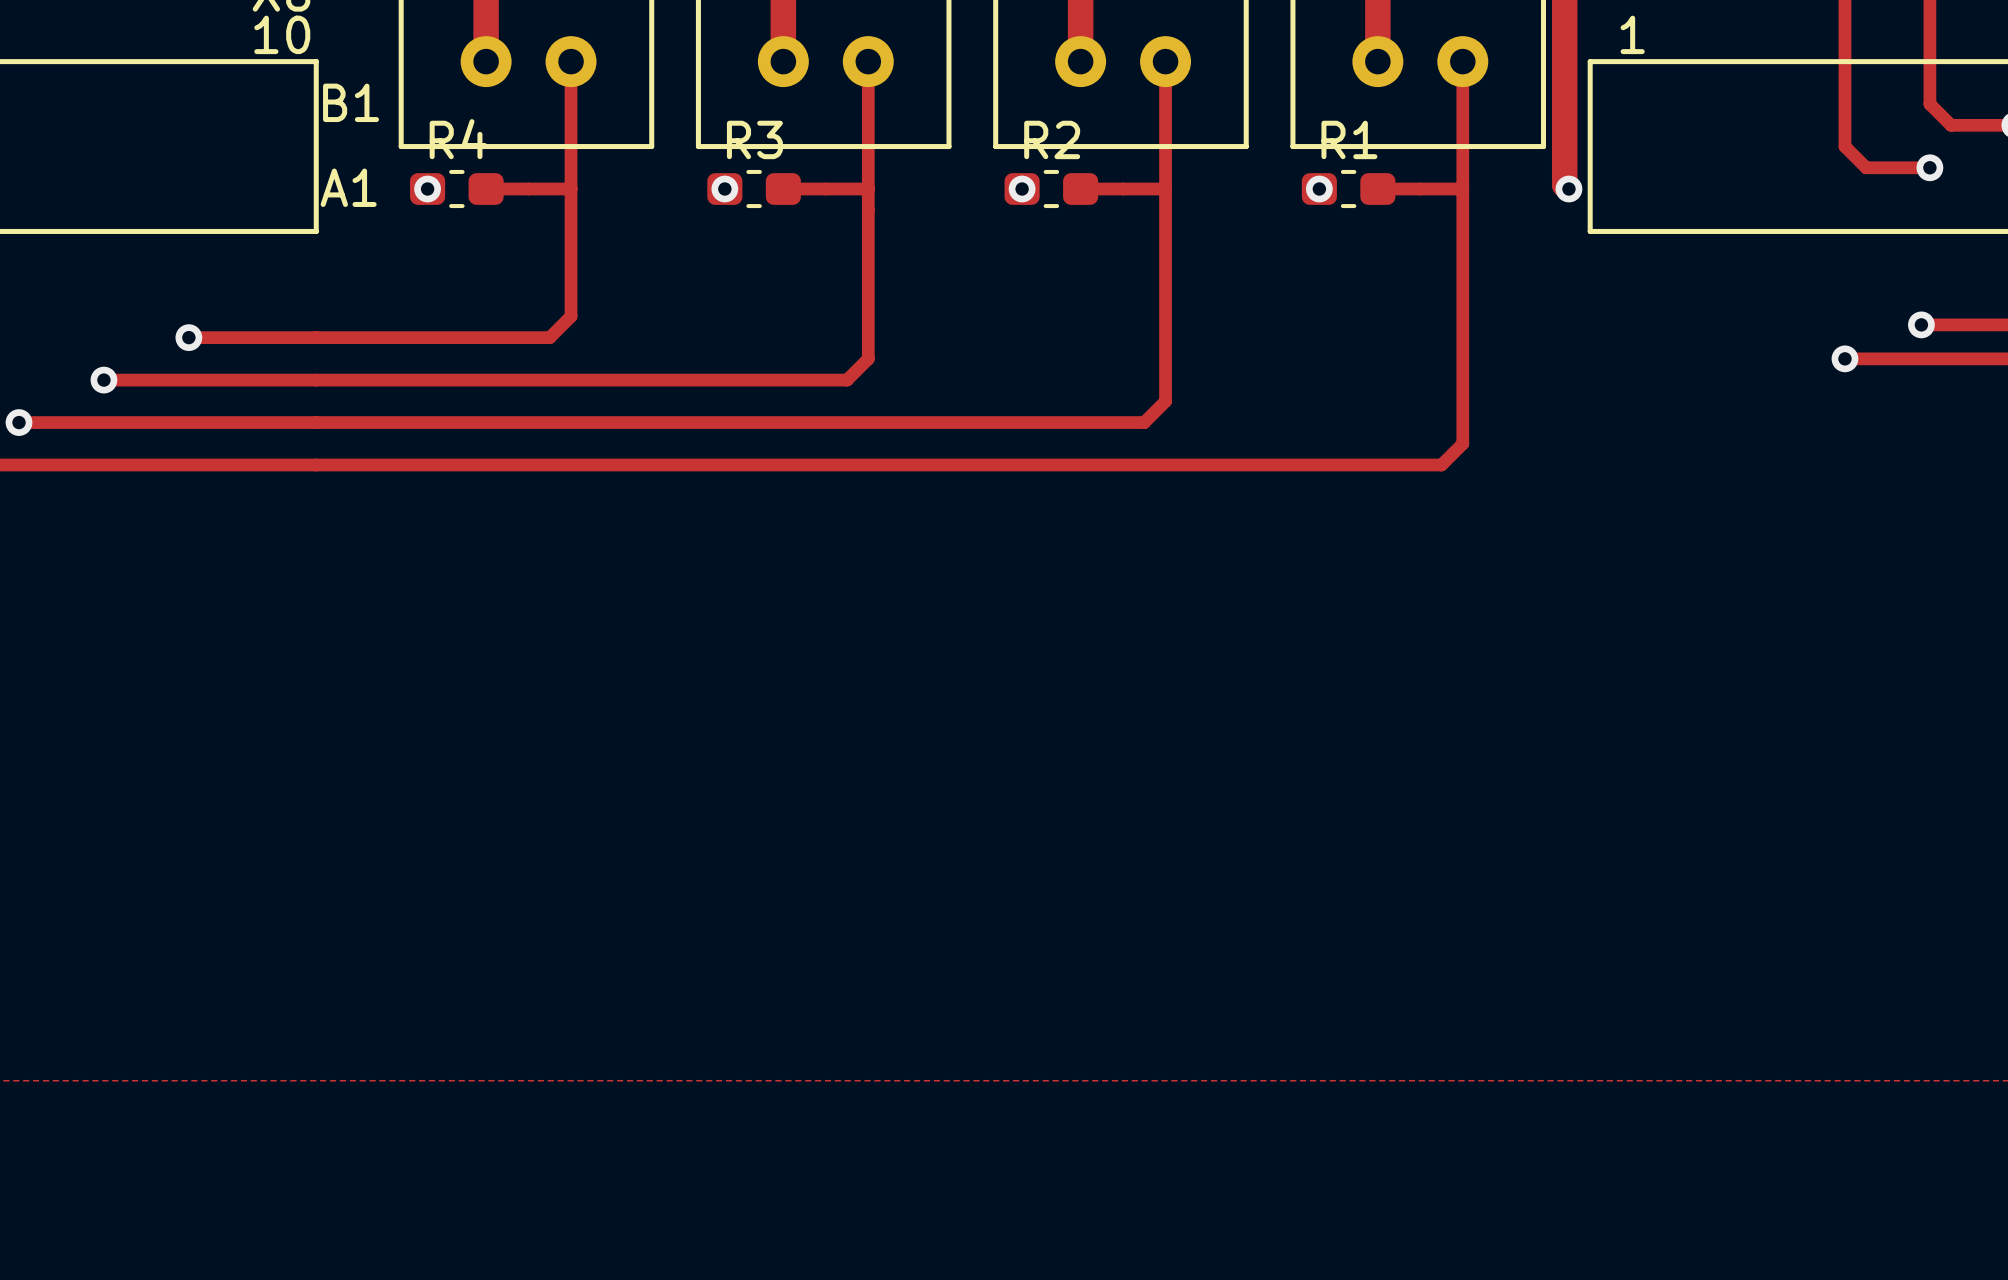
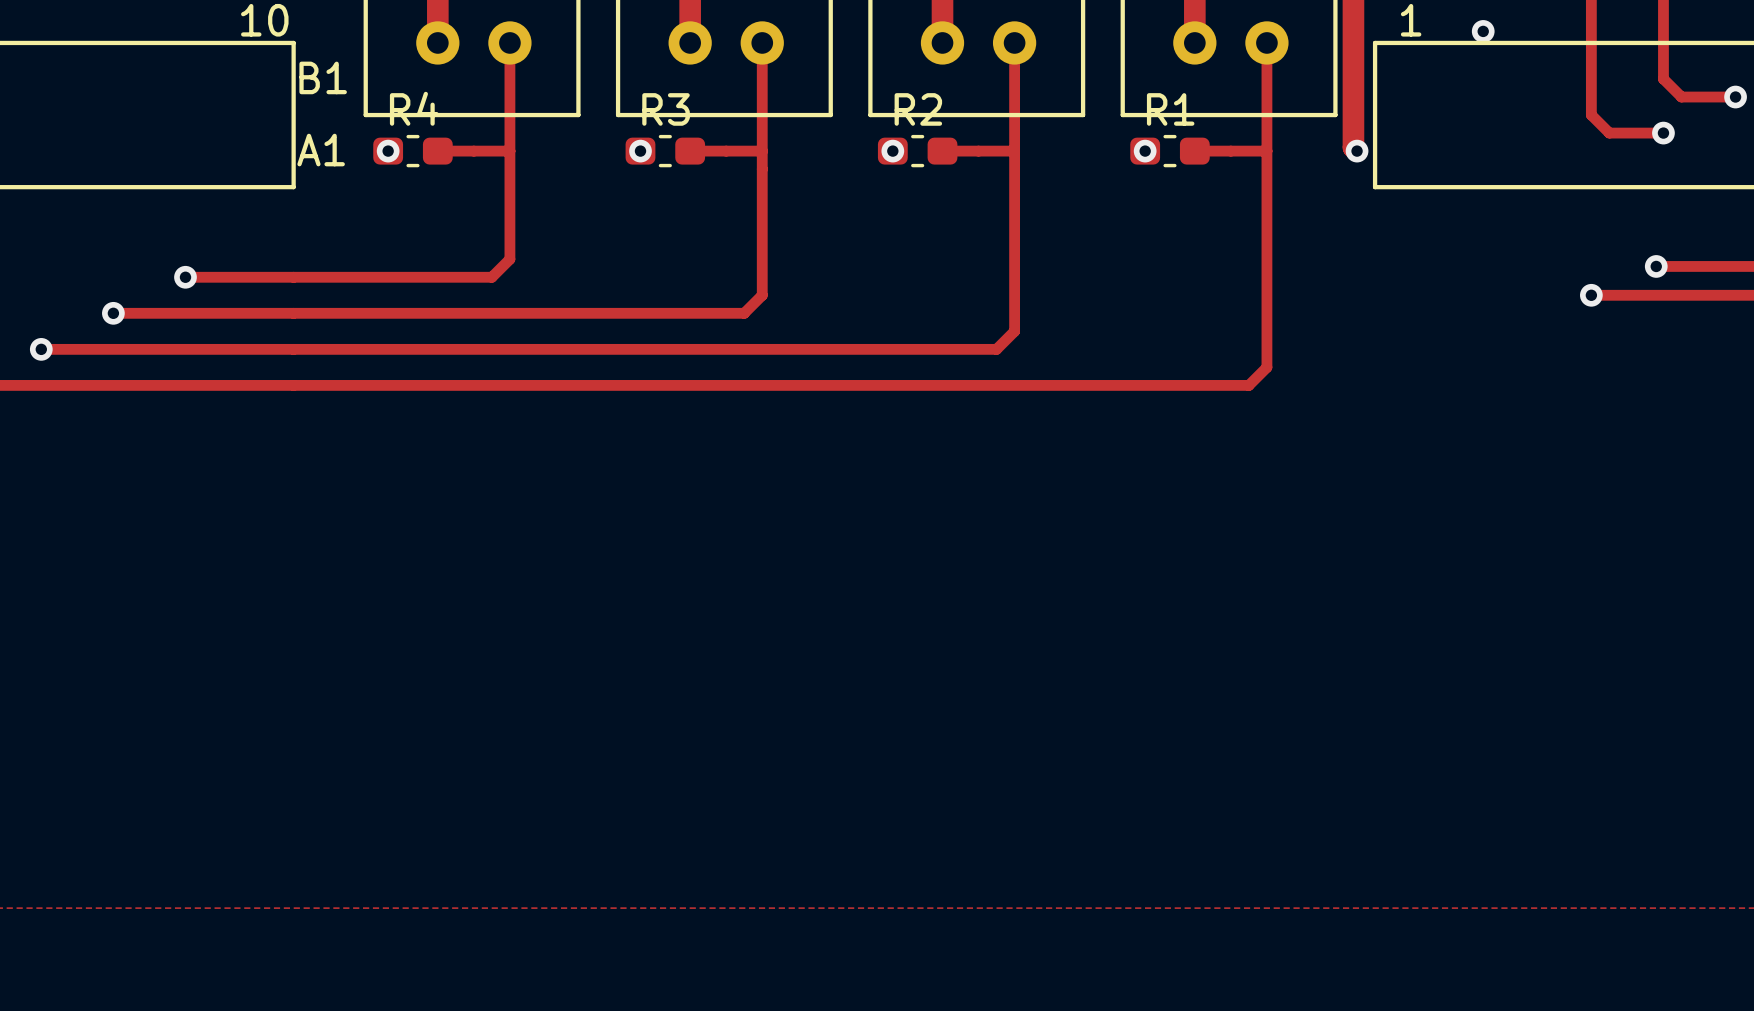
via: none -> (1483, 31)

